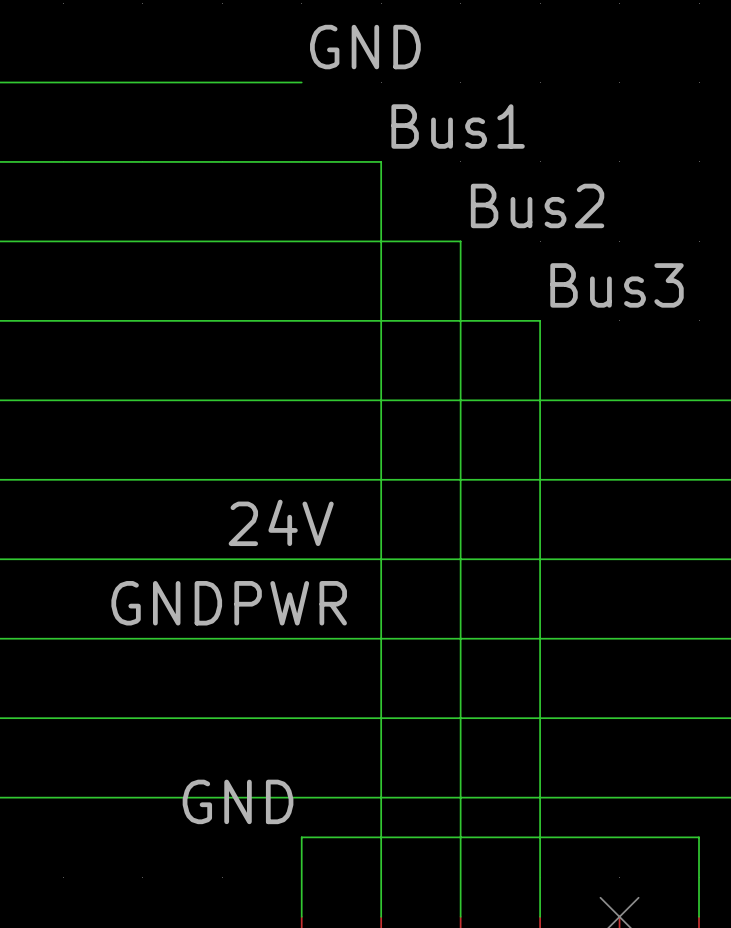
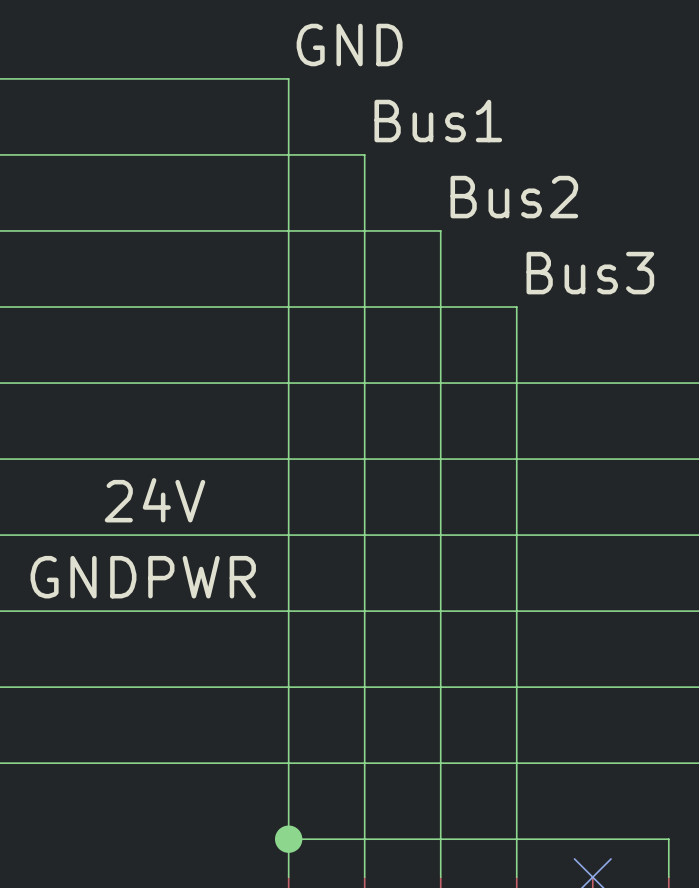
wire: none -> (288, 78) (288, 801)
label position: 24V (281, 522) -> 24V (155, 500)
label position: GNDPWR (229, 603) -> GNDPWR (143, 577)
label: GND (238, 801) -> none
wire: (301, 837) (699, 837) (699, 877) -> (288, 839) (668, 839)
junction: none -> (288, 839)

